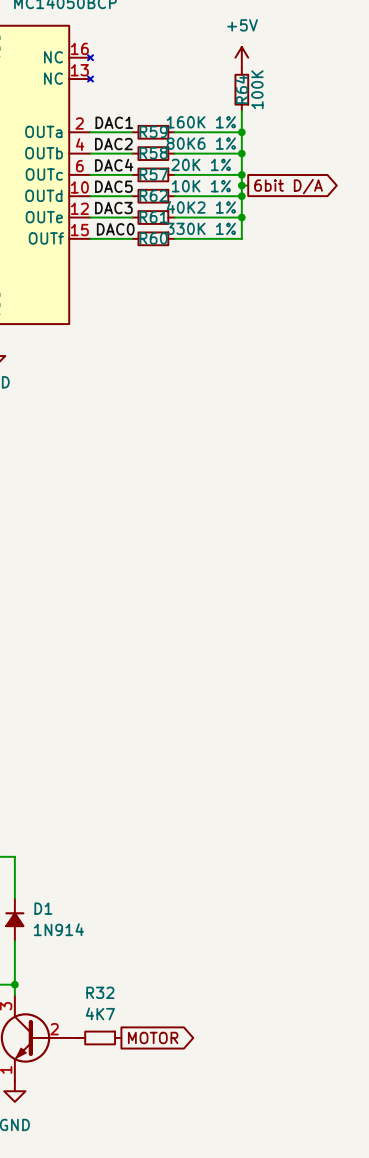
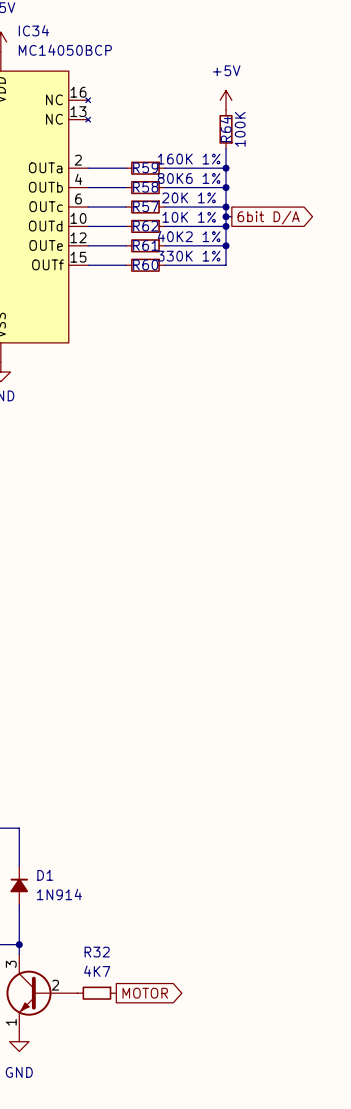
label: DAC1 (114, 122) -> none
label: DAC2 (113, 144) -> none
label: DAC4 (114, 165) -> none
label: DAC5 (113, 186) -> none
label: DAC3 (113, 208) -> none
label: DAC0 (115, 229) -> none

